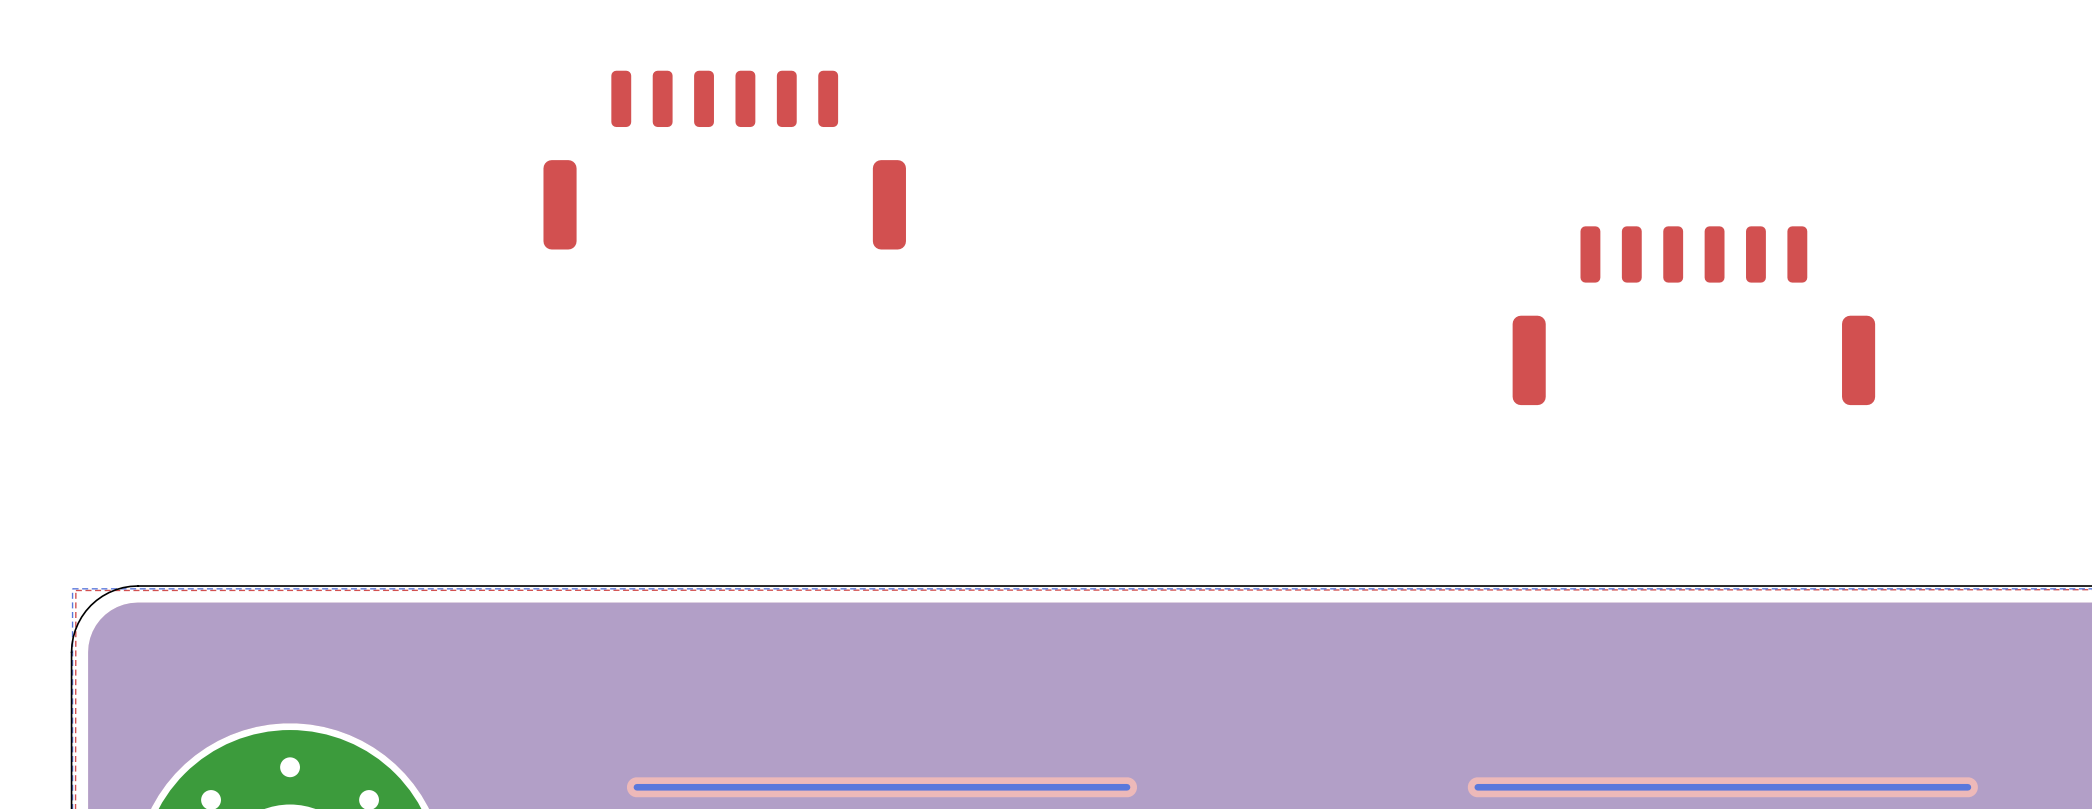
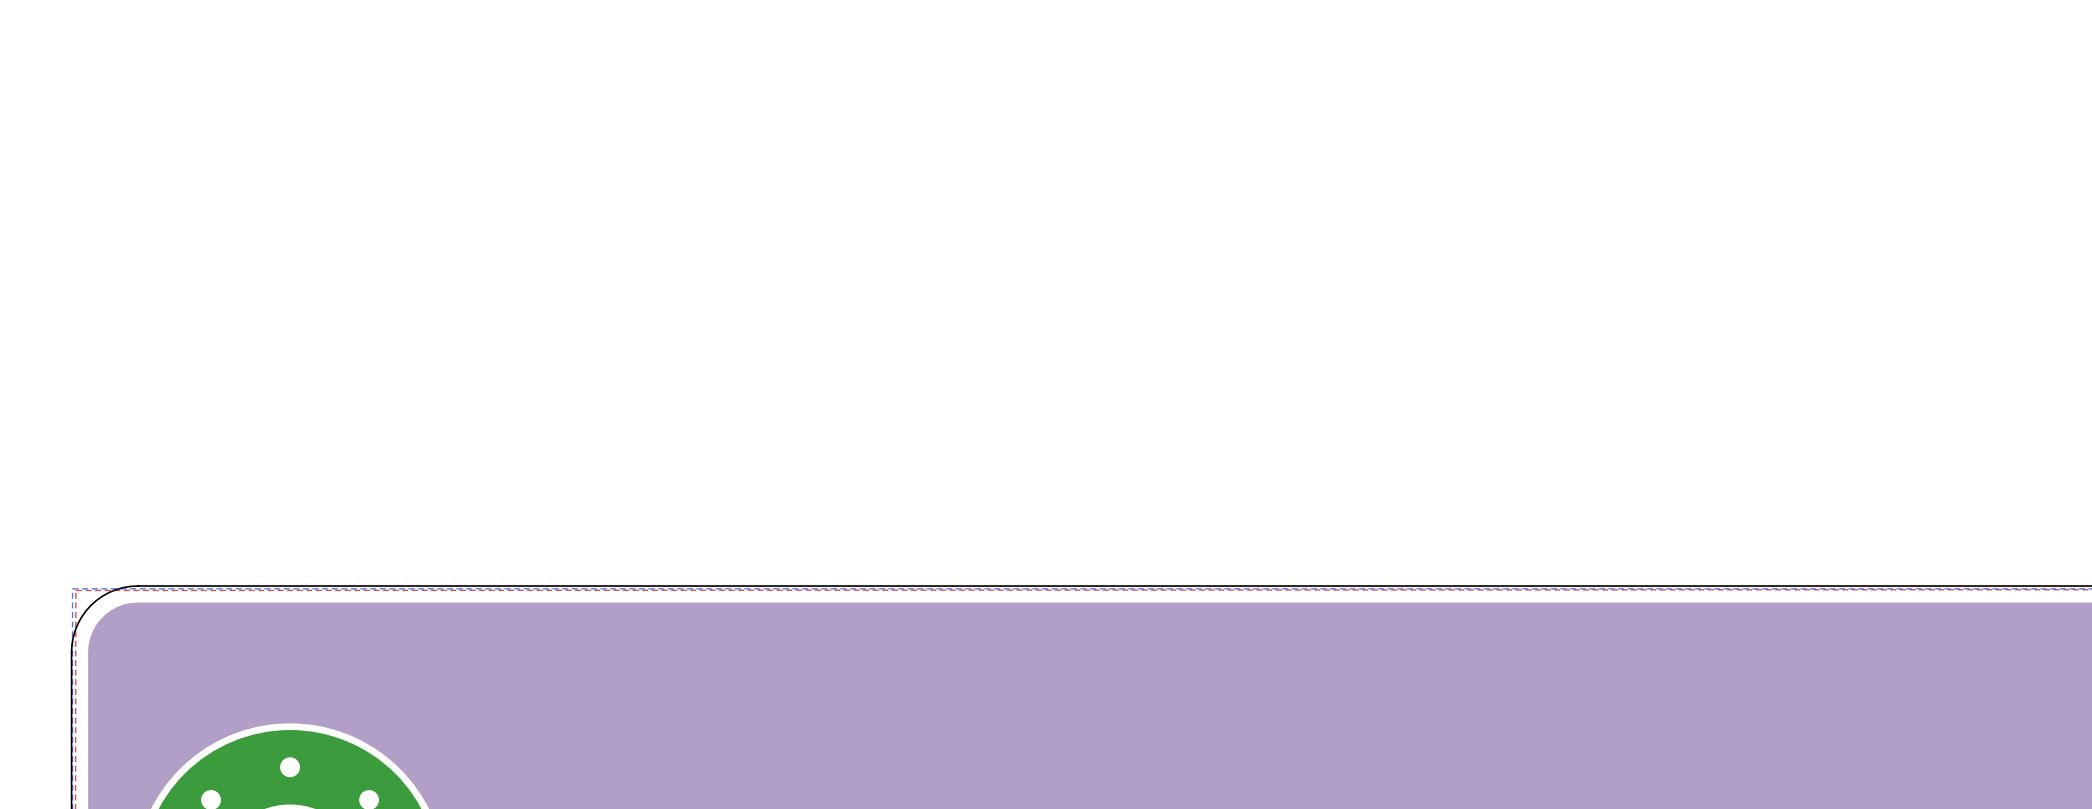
part: (724, 160) -> none
part: (1693, 315) -> none
bottom track: (1127, 787) (636, 787) -> none
bottom track: (1967, 787) (1477, 787) -> none

